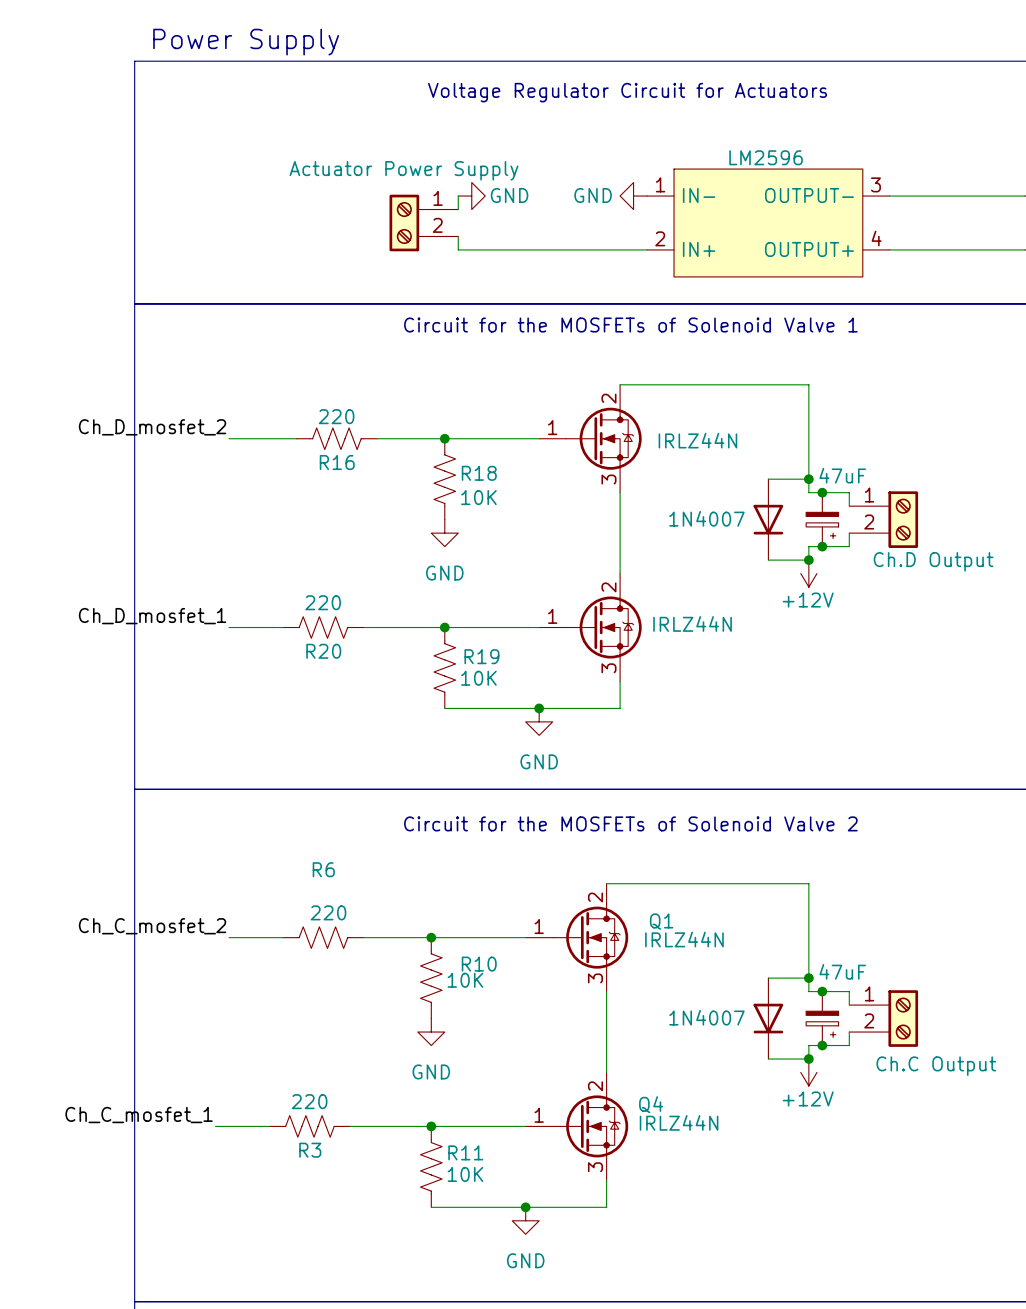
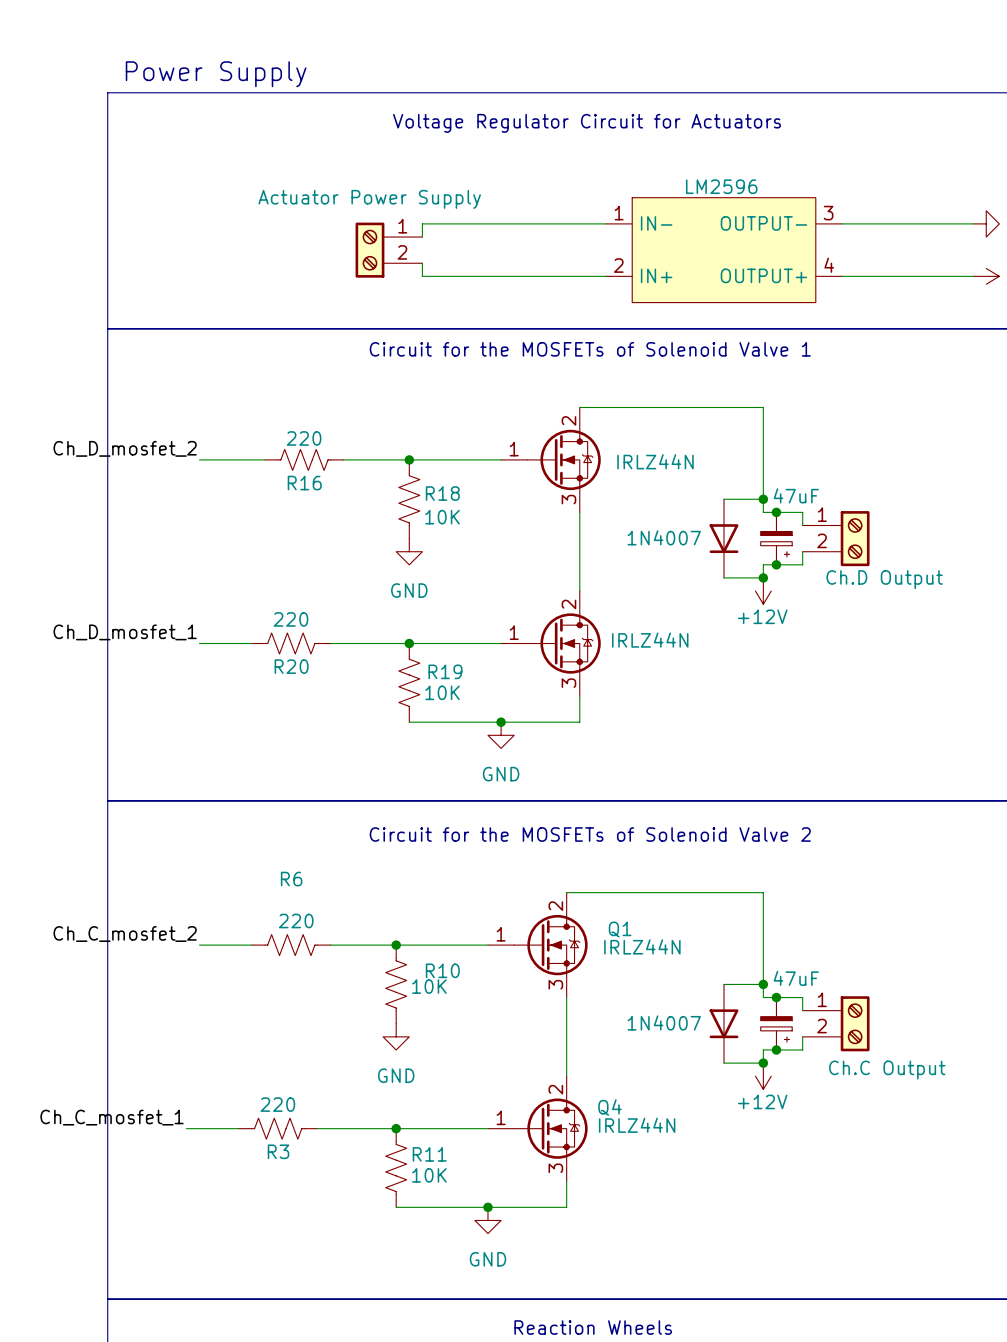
wire: none -> (422, 223) (606, 223)
power symbol: GND (471, 196) -> none
power symbol: GND (633, 196) -> none

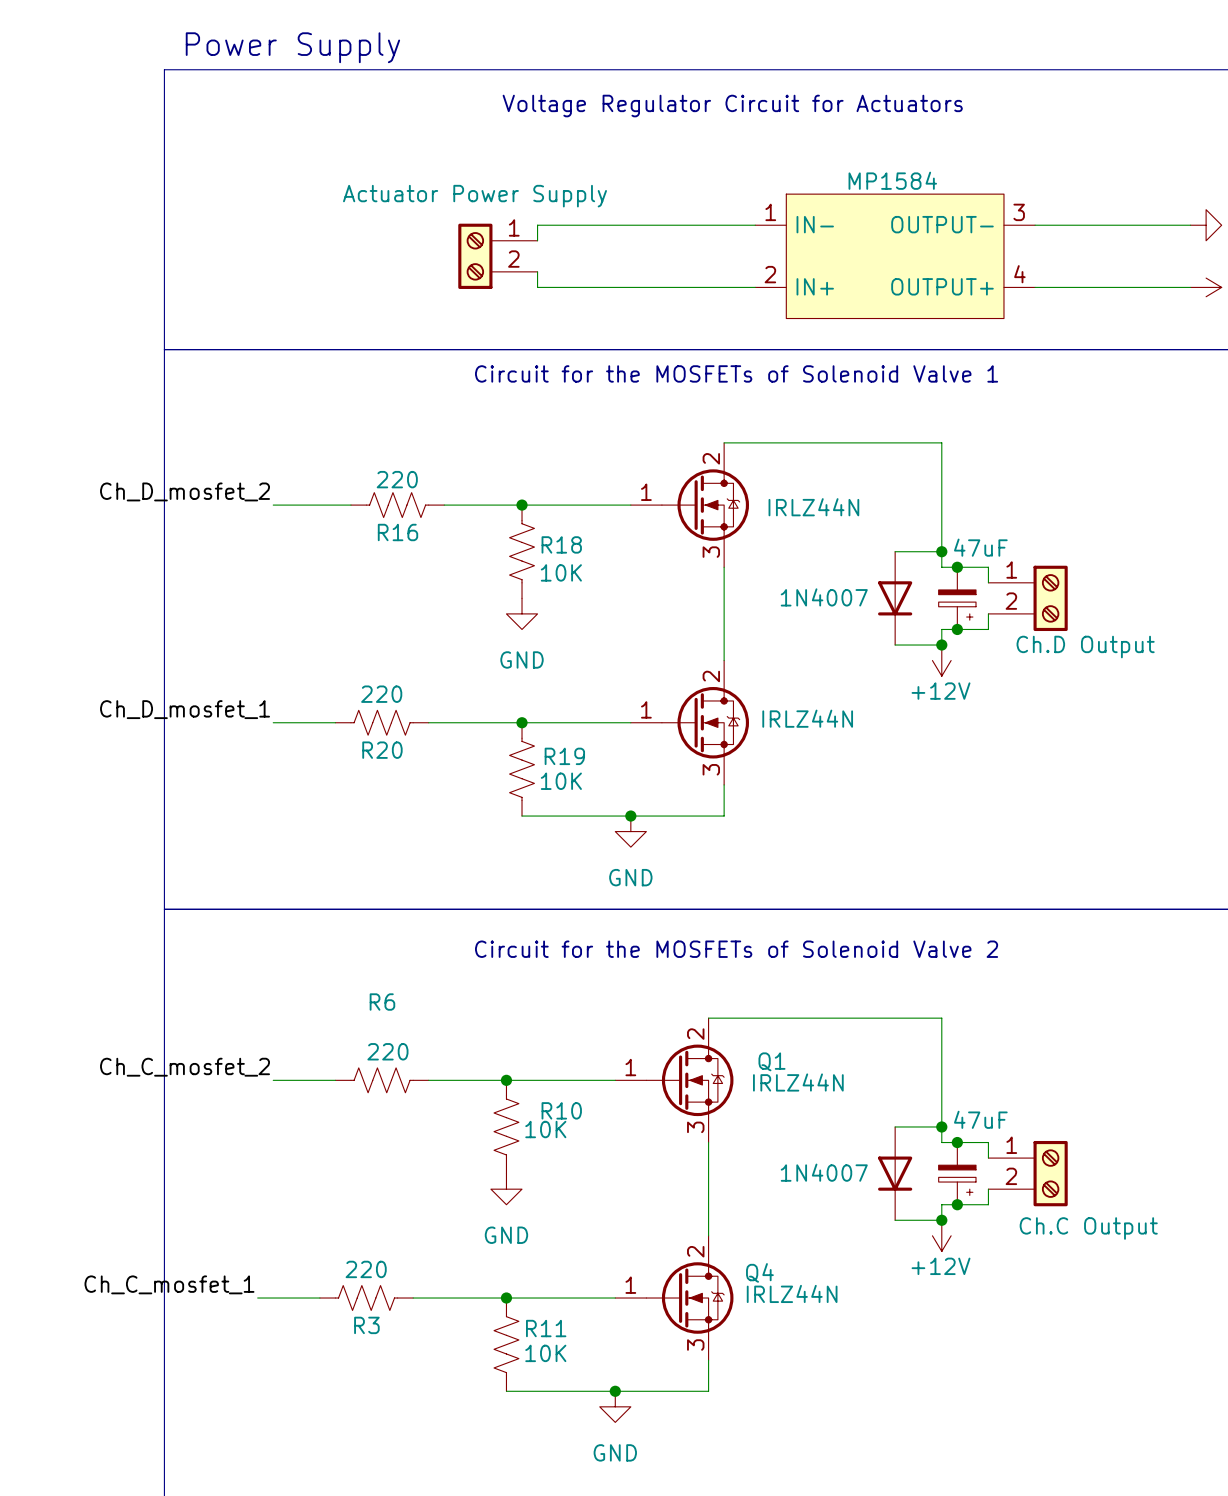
part value: LM2596 (721, 186) -> MP1584 (892, 180)

